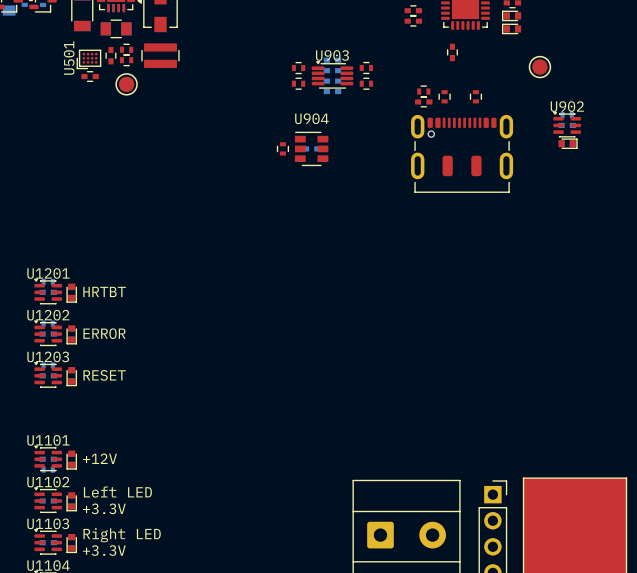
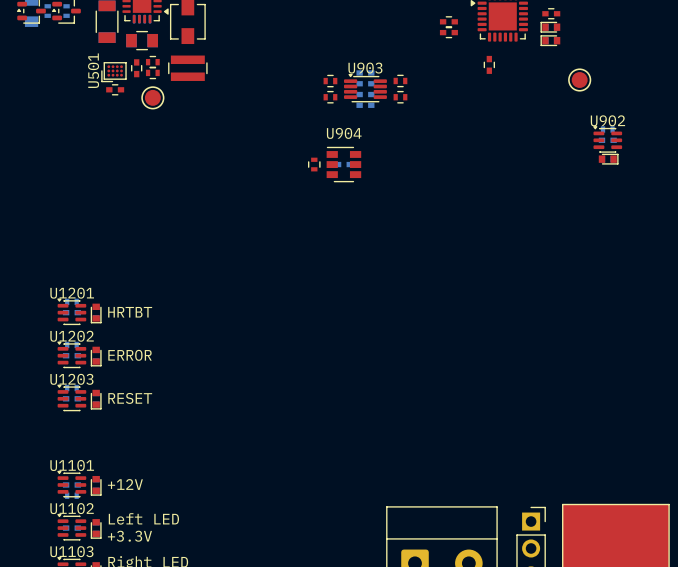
part: (423, 91) -> none
part: (444, 96) -> none
part: (475, 96) -> none
part: (423, 101) -> none
part: (462, 153) -> none

